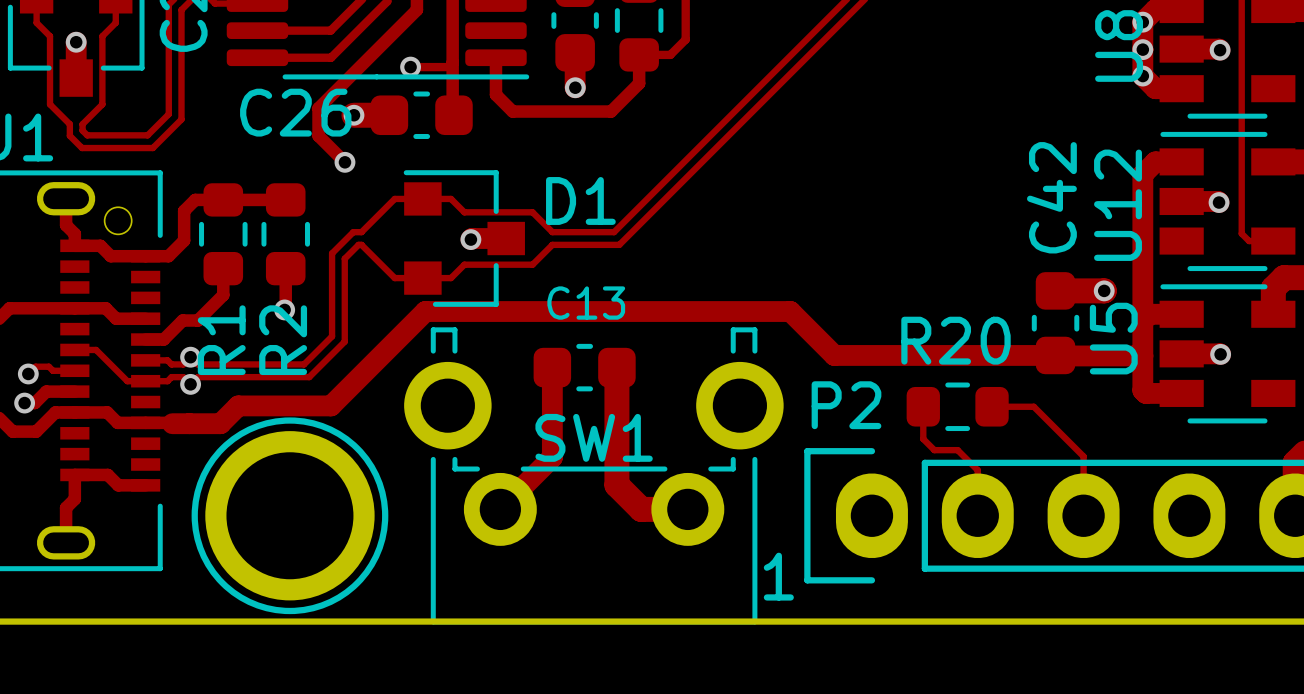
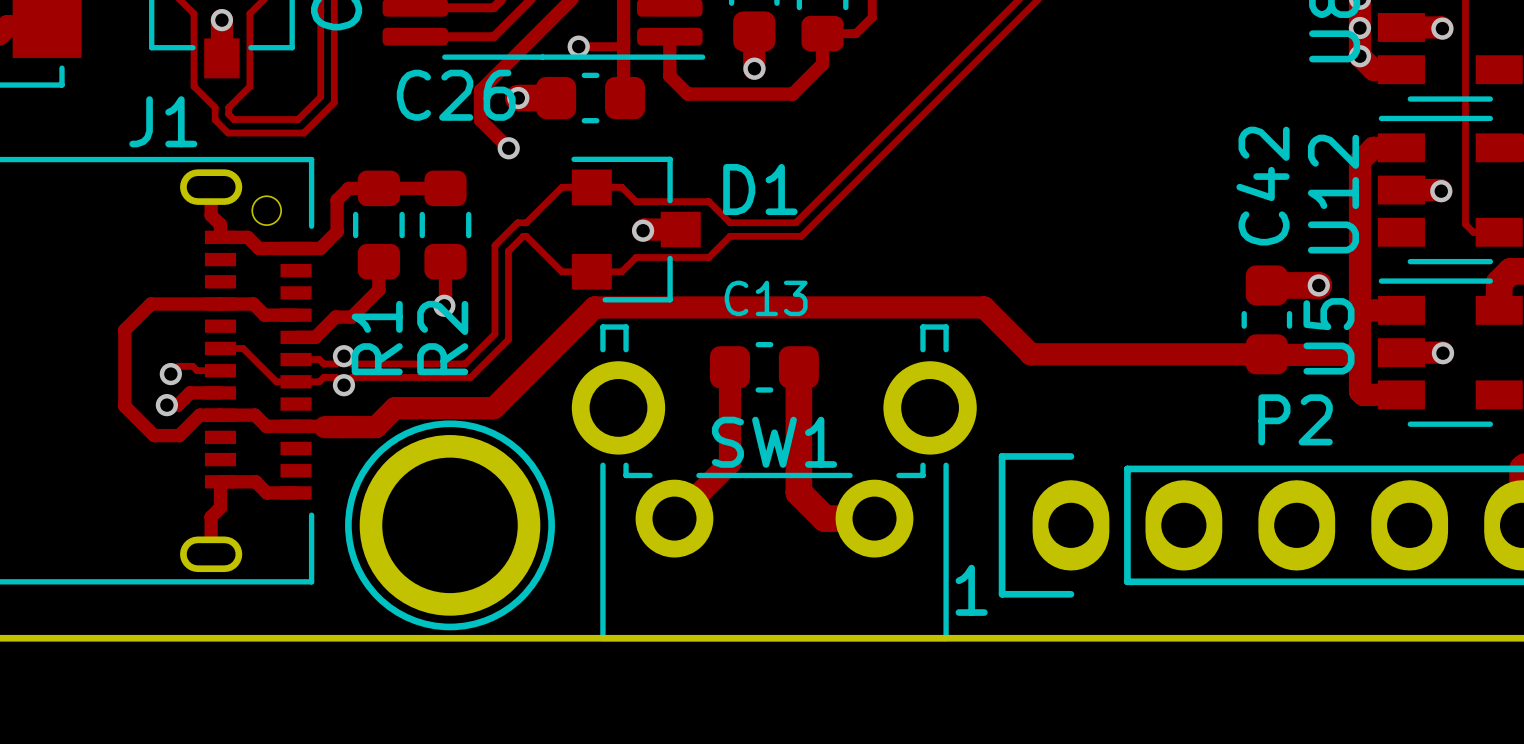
P2 name position: P2 (846, 405) -> P2 (1295, 419)
track: (923, 406) (923, 439) (934, 450) (957, 450) (977, 470) (977, 515) -> none
R20: (957, 406) -> none
track: (992, 406) (1033, 406) (1083, 456) (1083, 515) -> none

